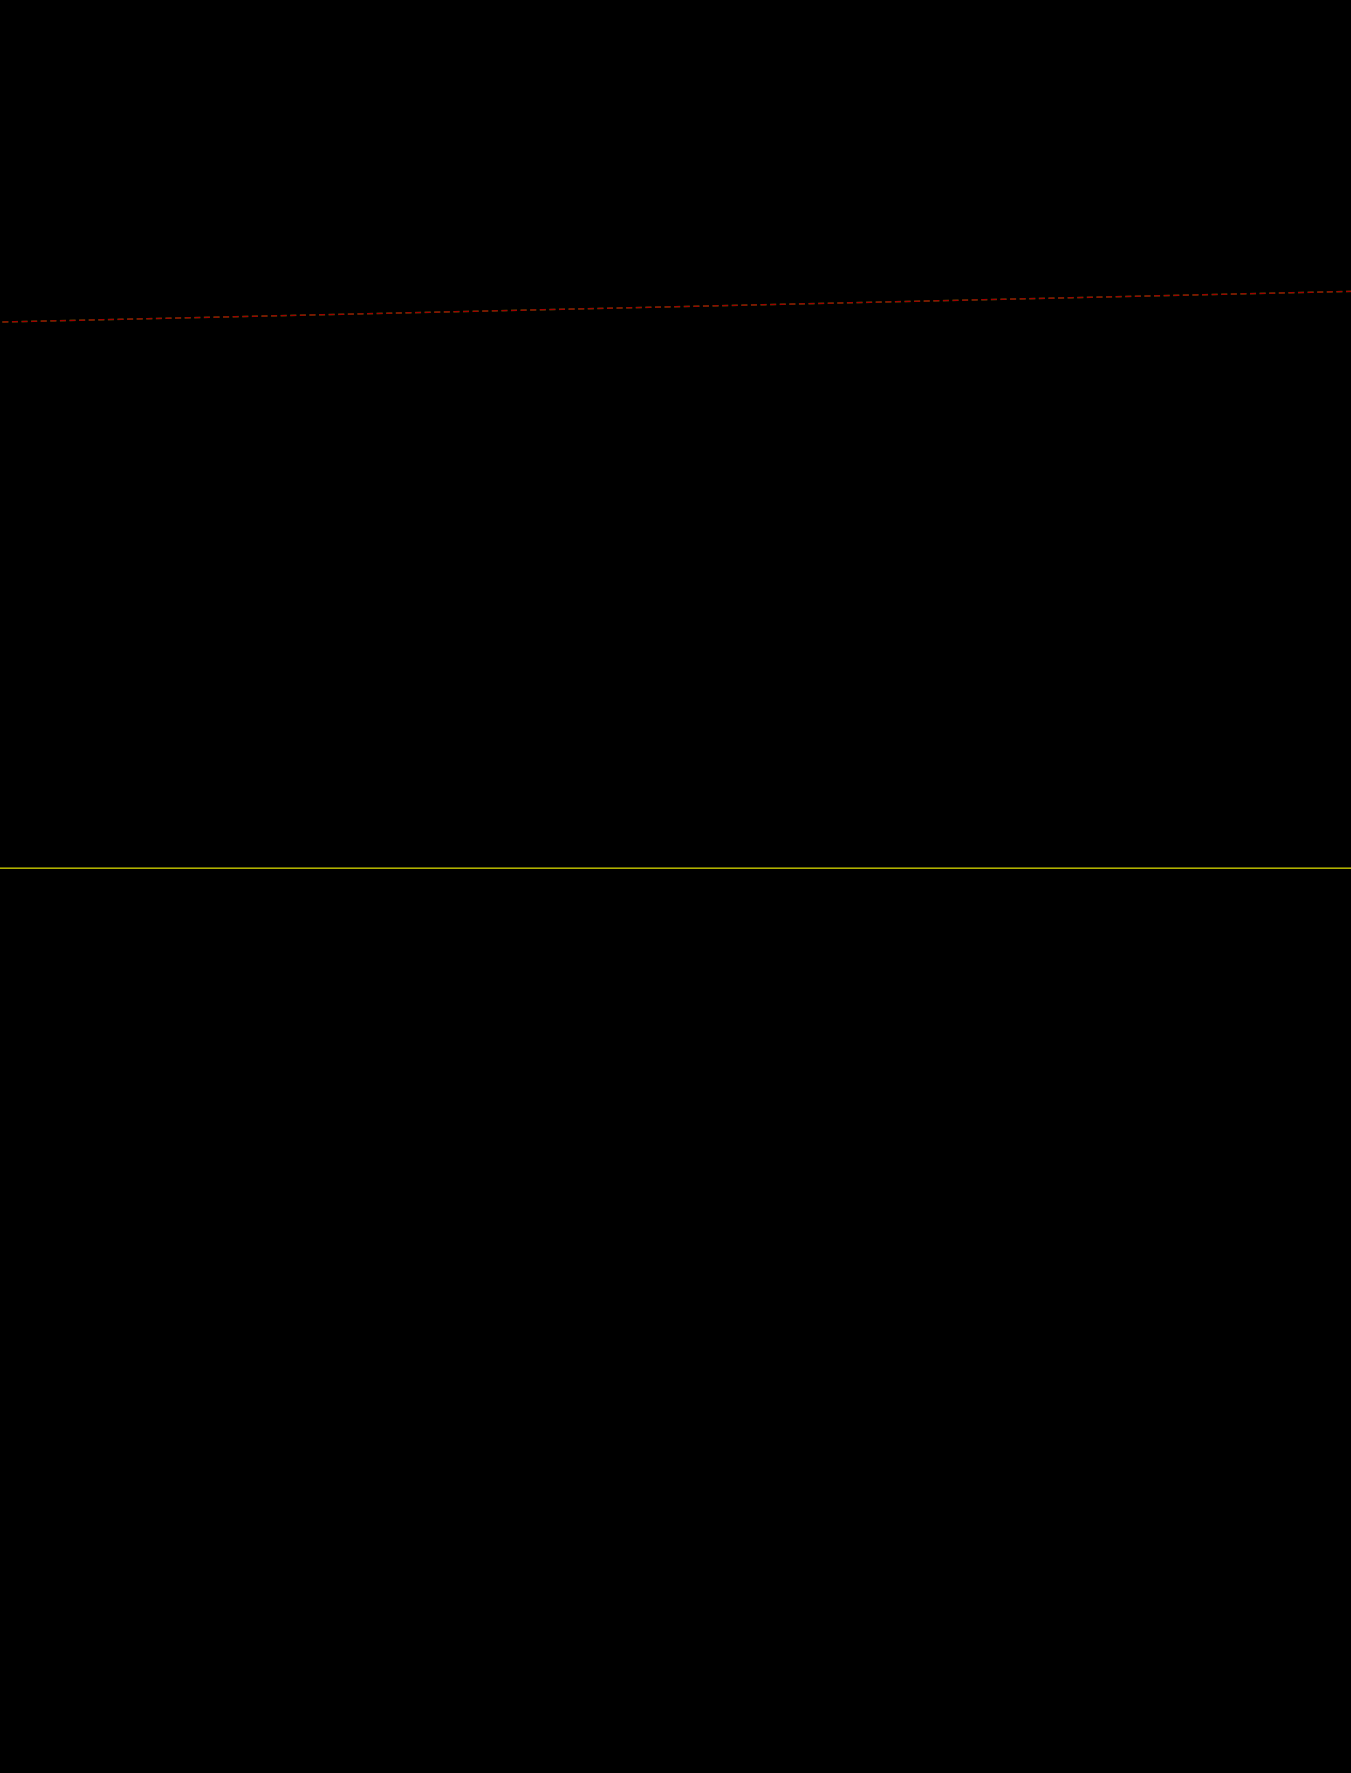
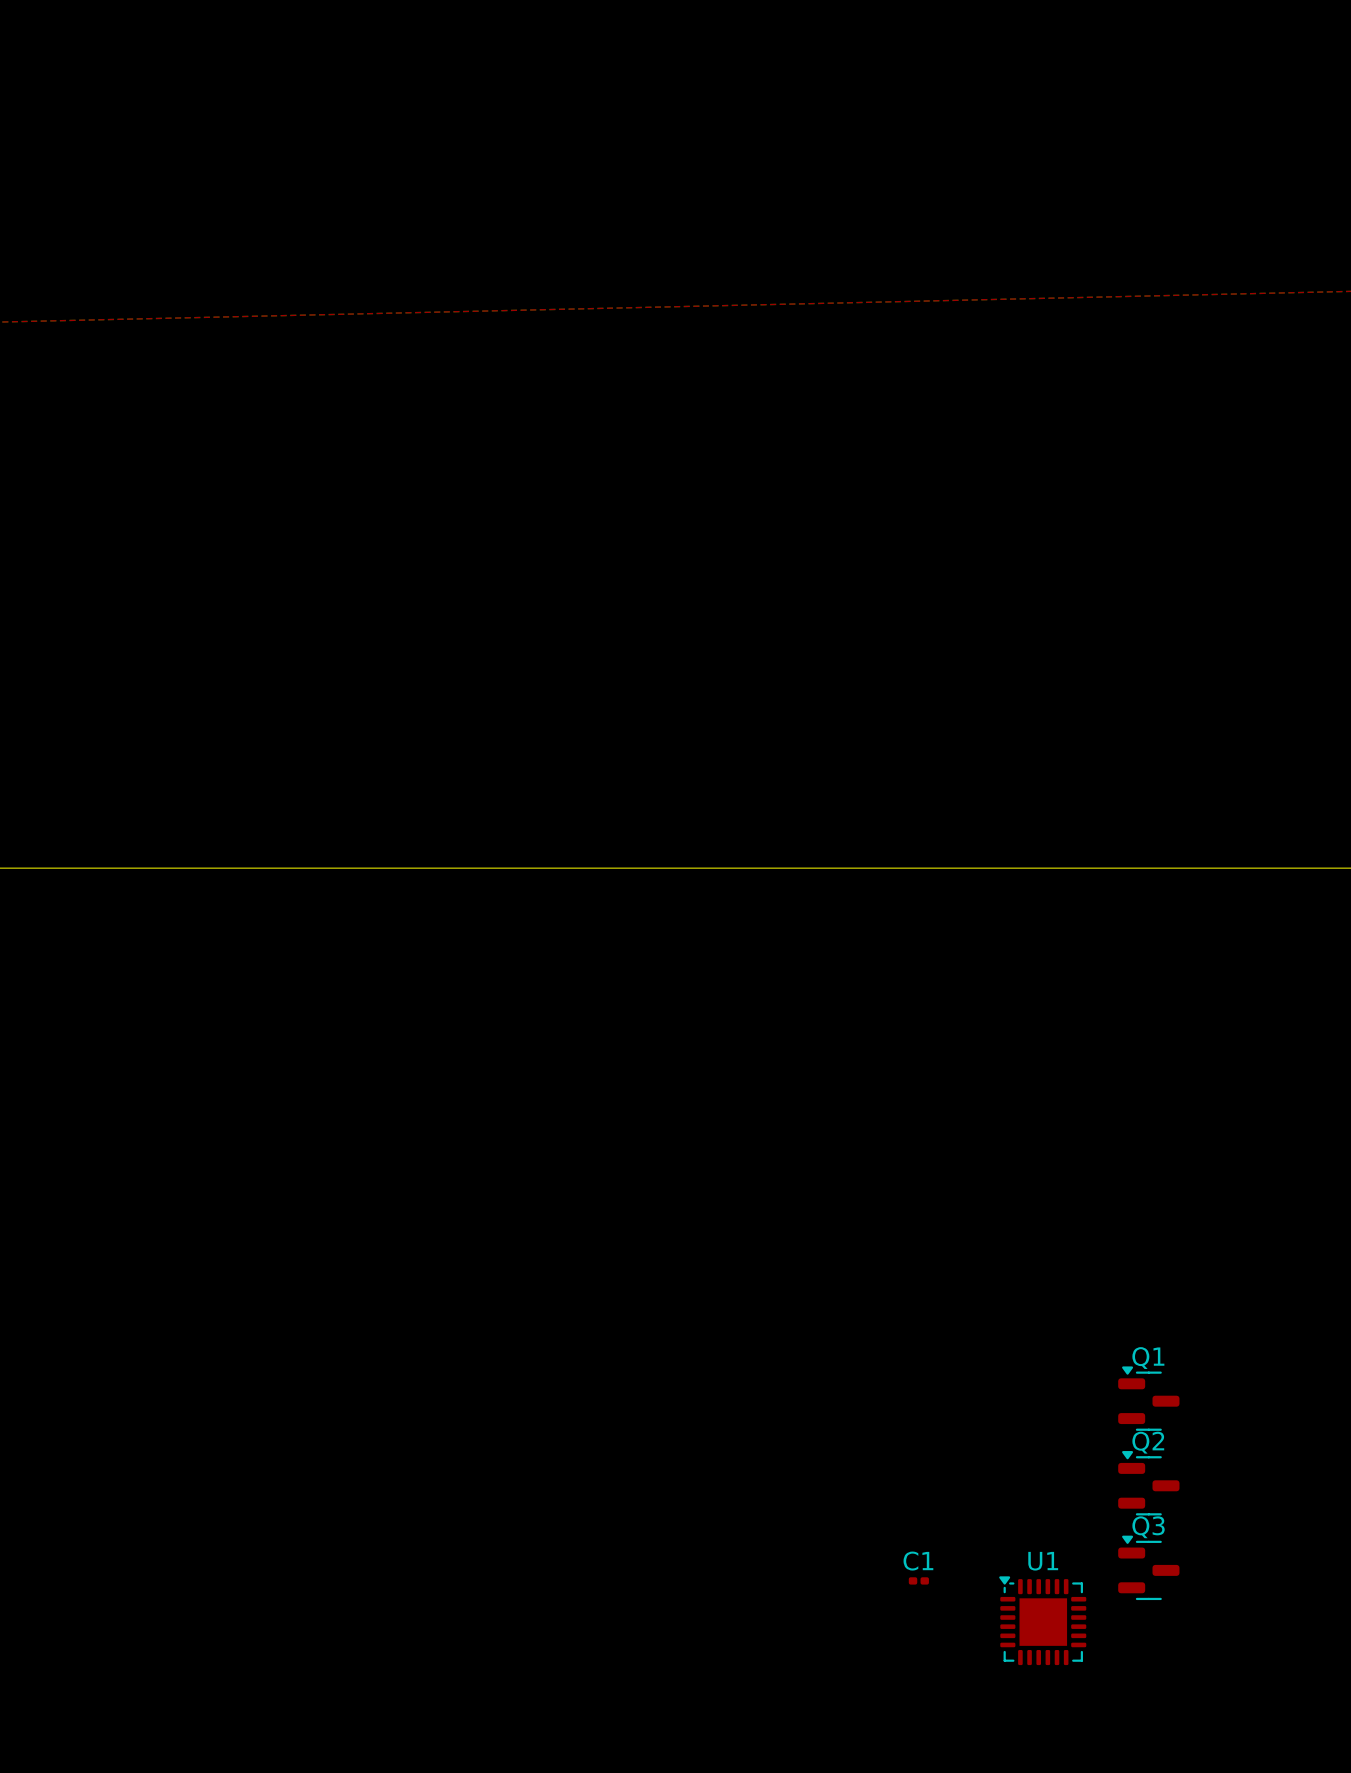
Q1: none -> (1148, 1398)
Q2: none -> (1148, 1483)
Q3: none -> (1148, 1567)
C1: none -> (918, 1580)
U1: none -> (1042, 1620)

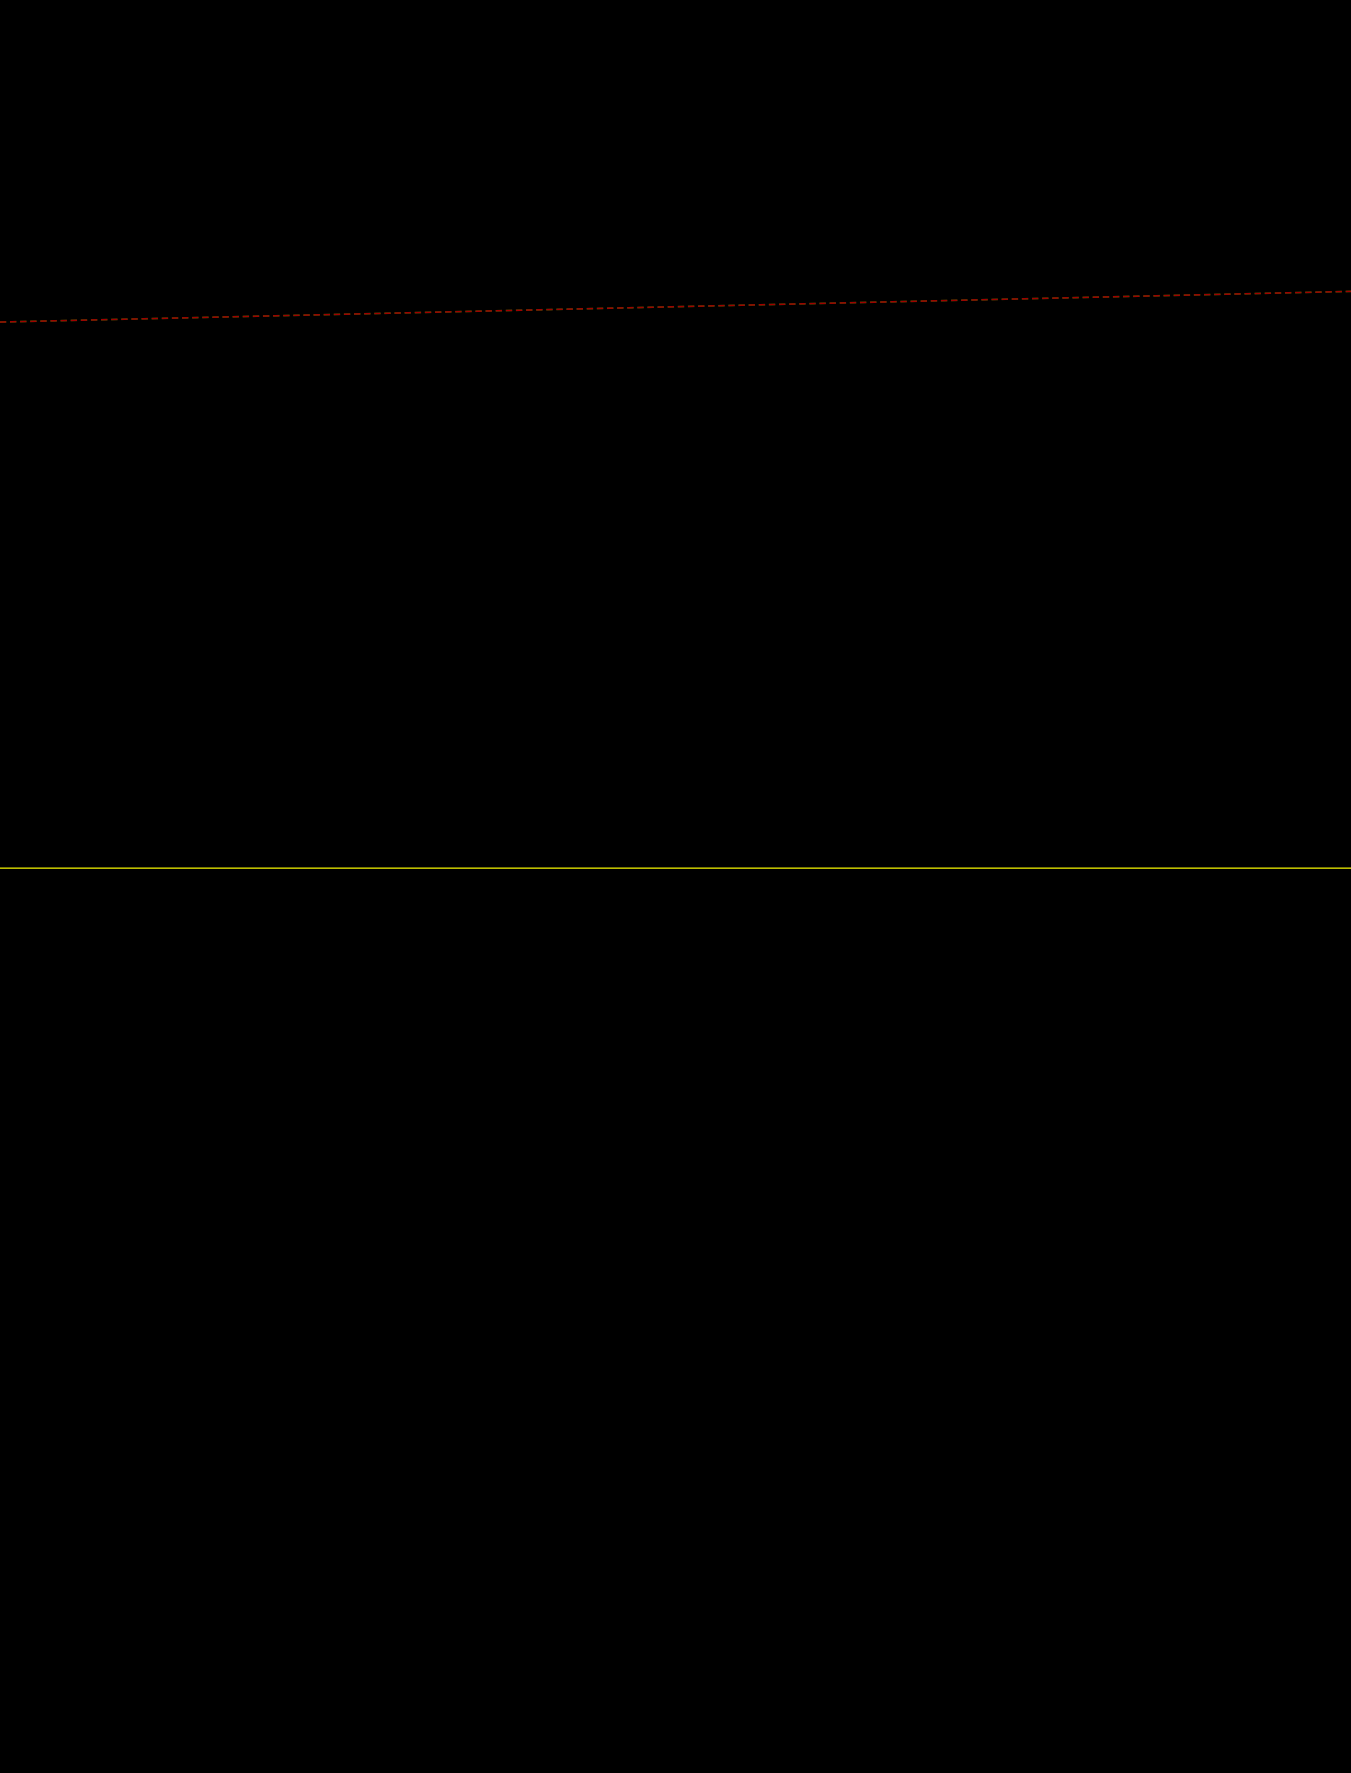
Q1: (1148, 1398) -> none
Q2: (1148, 1483) -> none
Q3: (1148, 1567) -> none
C1: (918, 1580) -> none
U1: (1042, 1620) -> none

